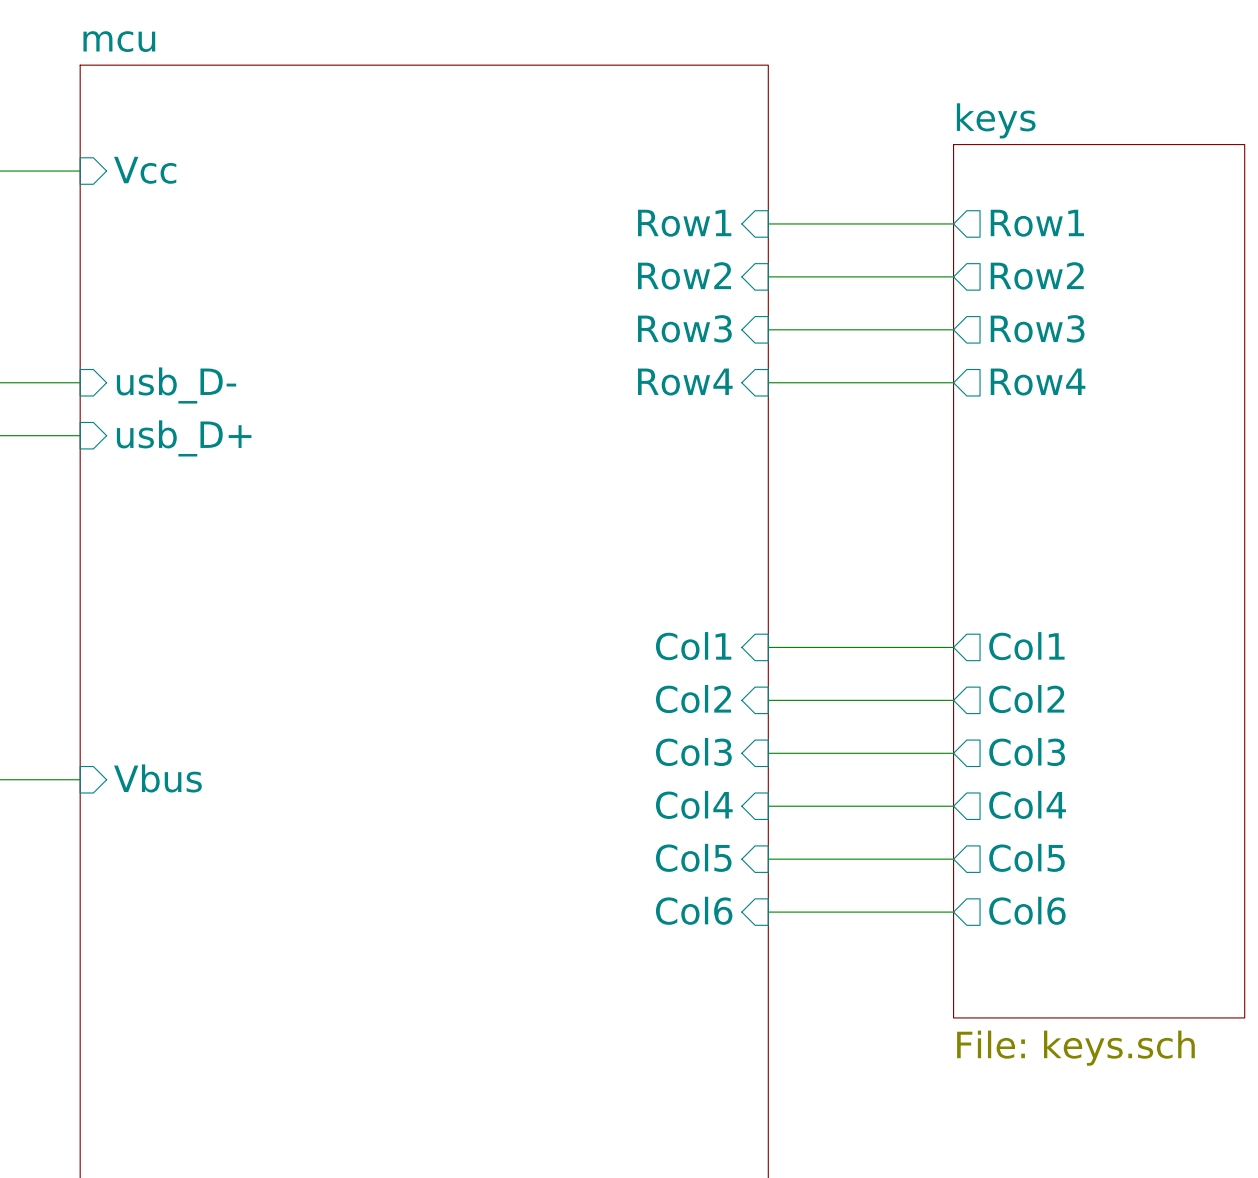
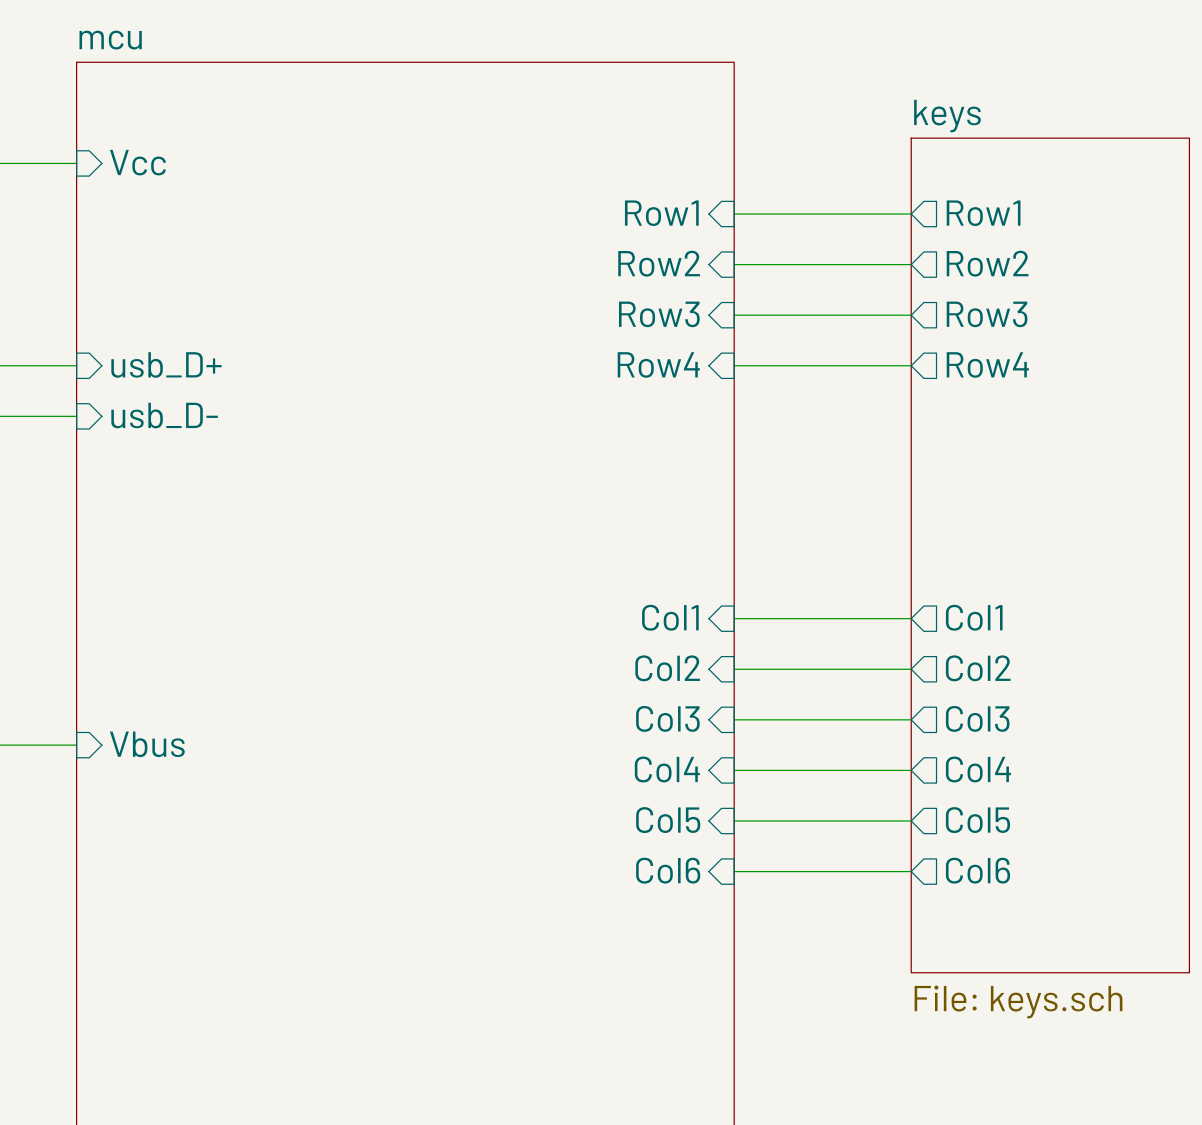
sheet pin: usb_D- (176, 385) -> usb_D+ (166, 364)
sheet pin: usb_D+ (184, 438) -> usb_D- (164, 415)

